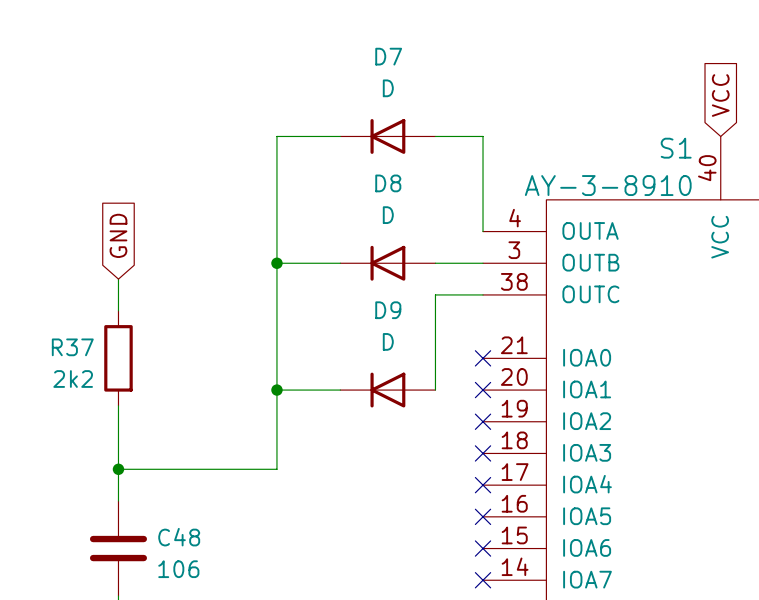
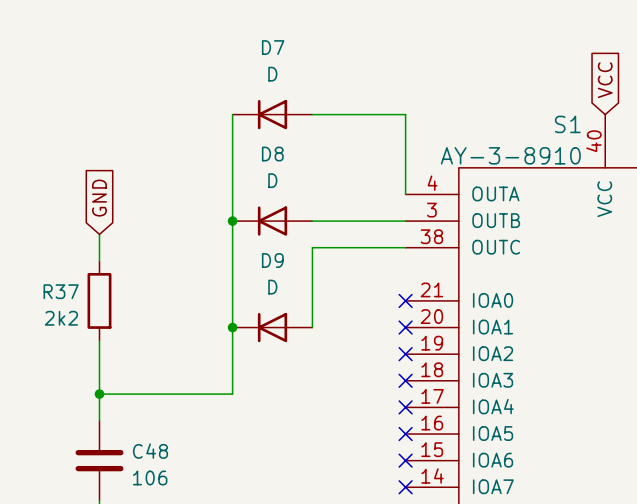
D7 position: (387, 136) -> (272, 114)
D8 position: (387, 263) -> (272, 221)
wire: (435, 294) (435, 390) -> (365, 247) (312, 247) (312, 327)
D9 position: (387, 390) -> (272, 327)

